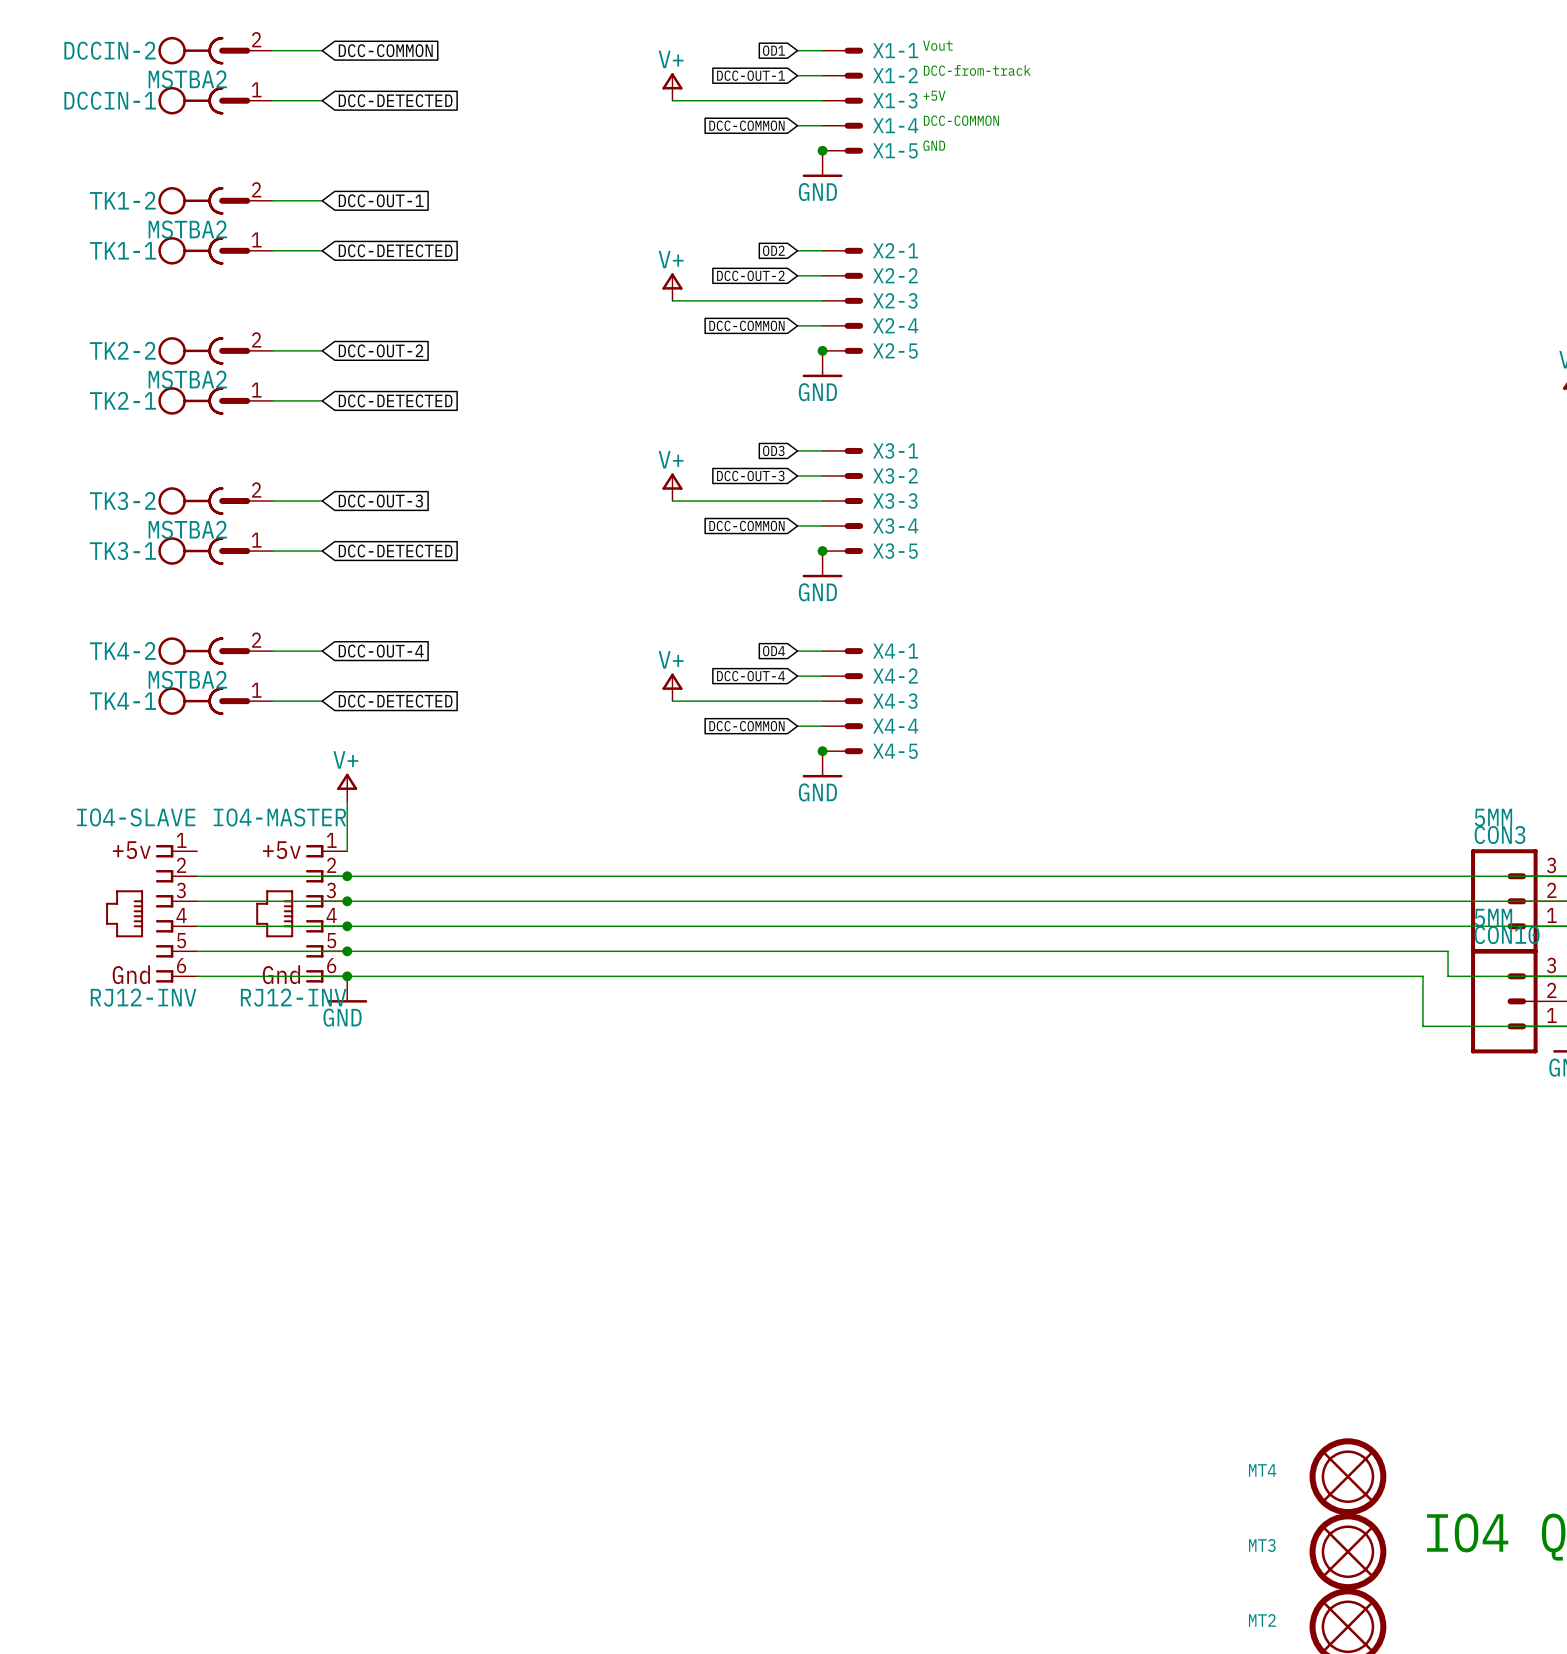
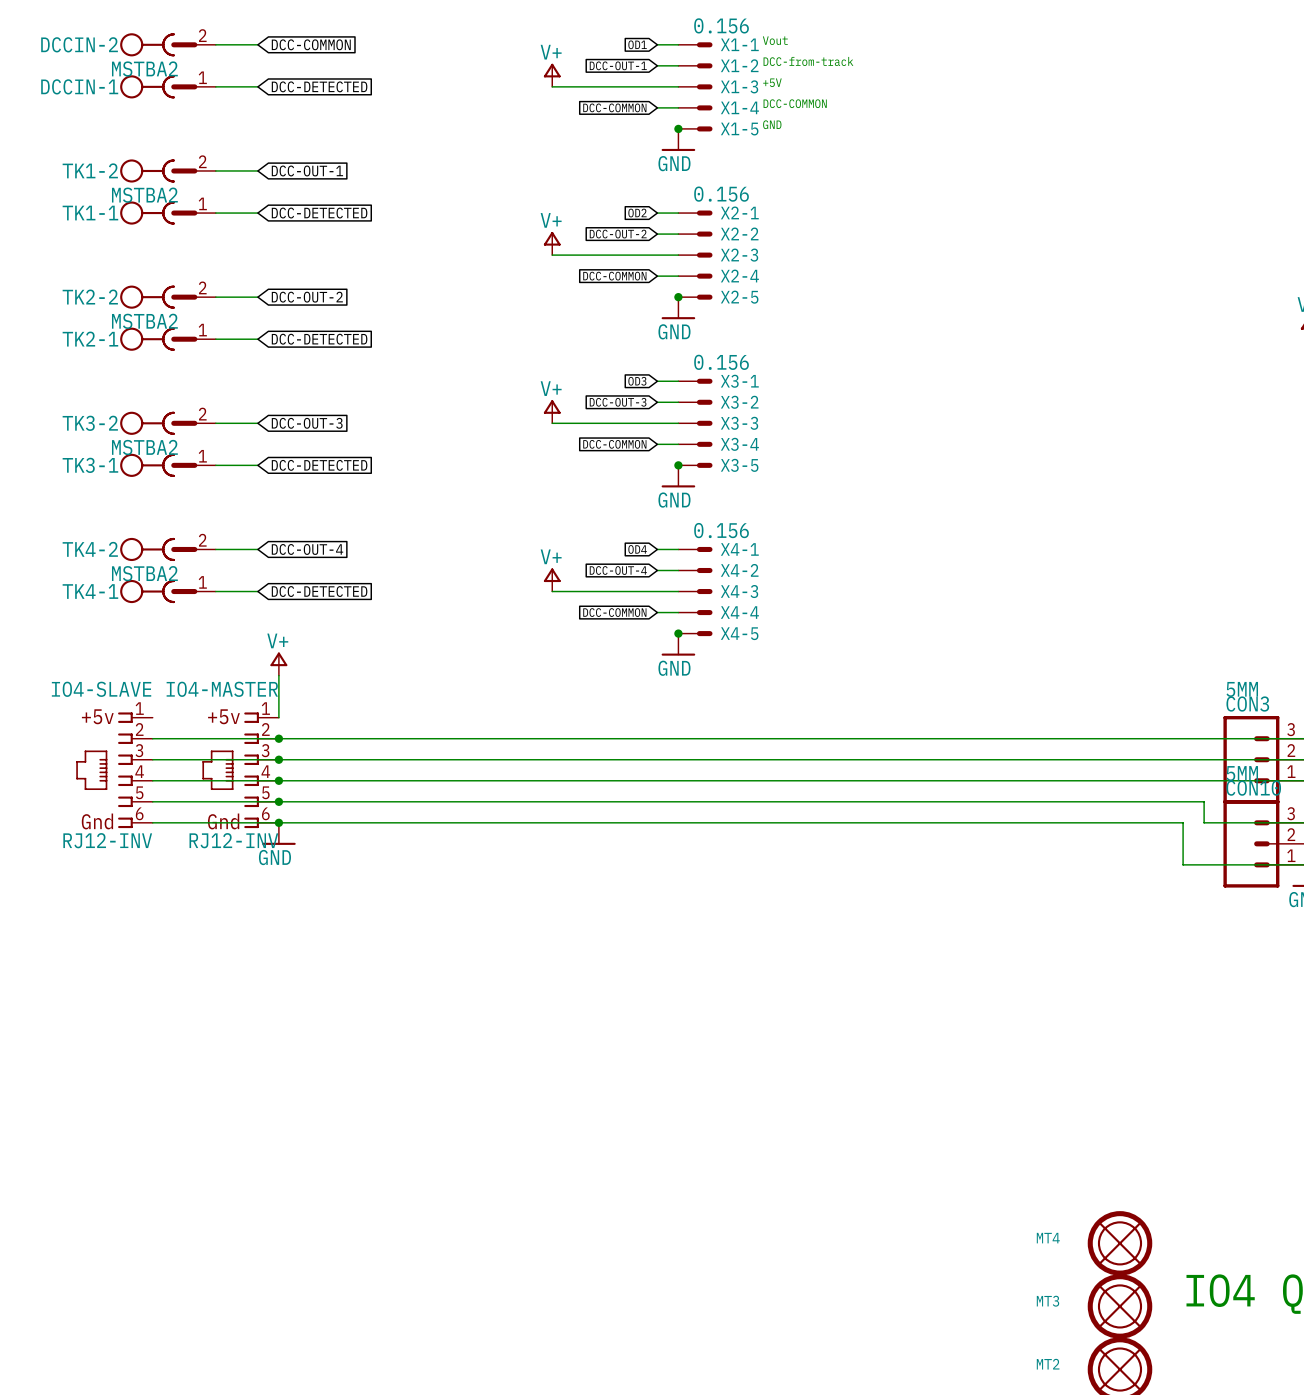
X1-1 value: none -> 0.156 (721, 25)
X2-1 value: none -> 0.156 (721, 194)
X3-1 value: none -> 0.156 (721, 362)
X4-1 value: none -> 0.156 (721, 530)

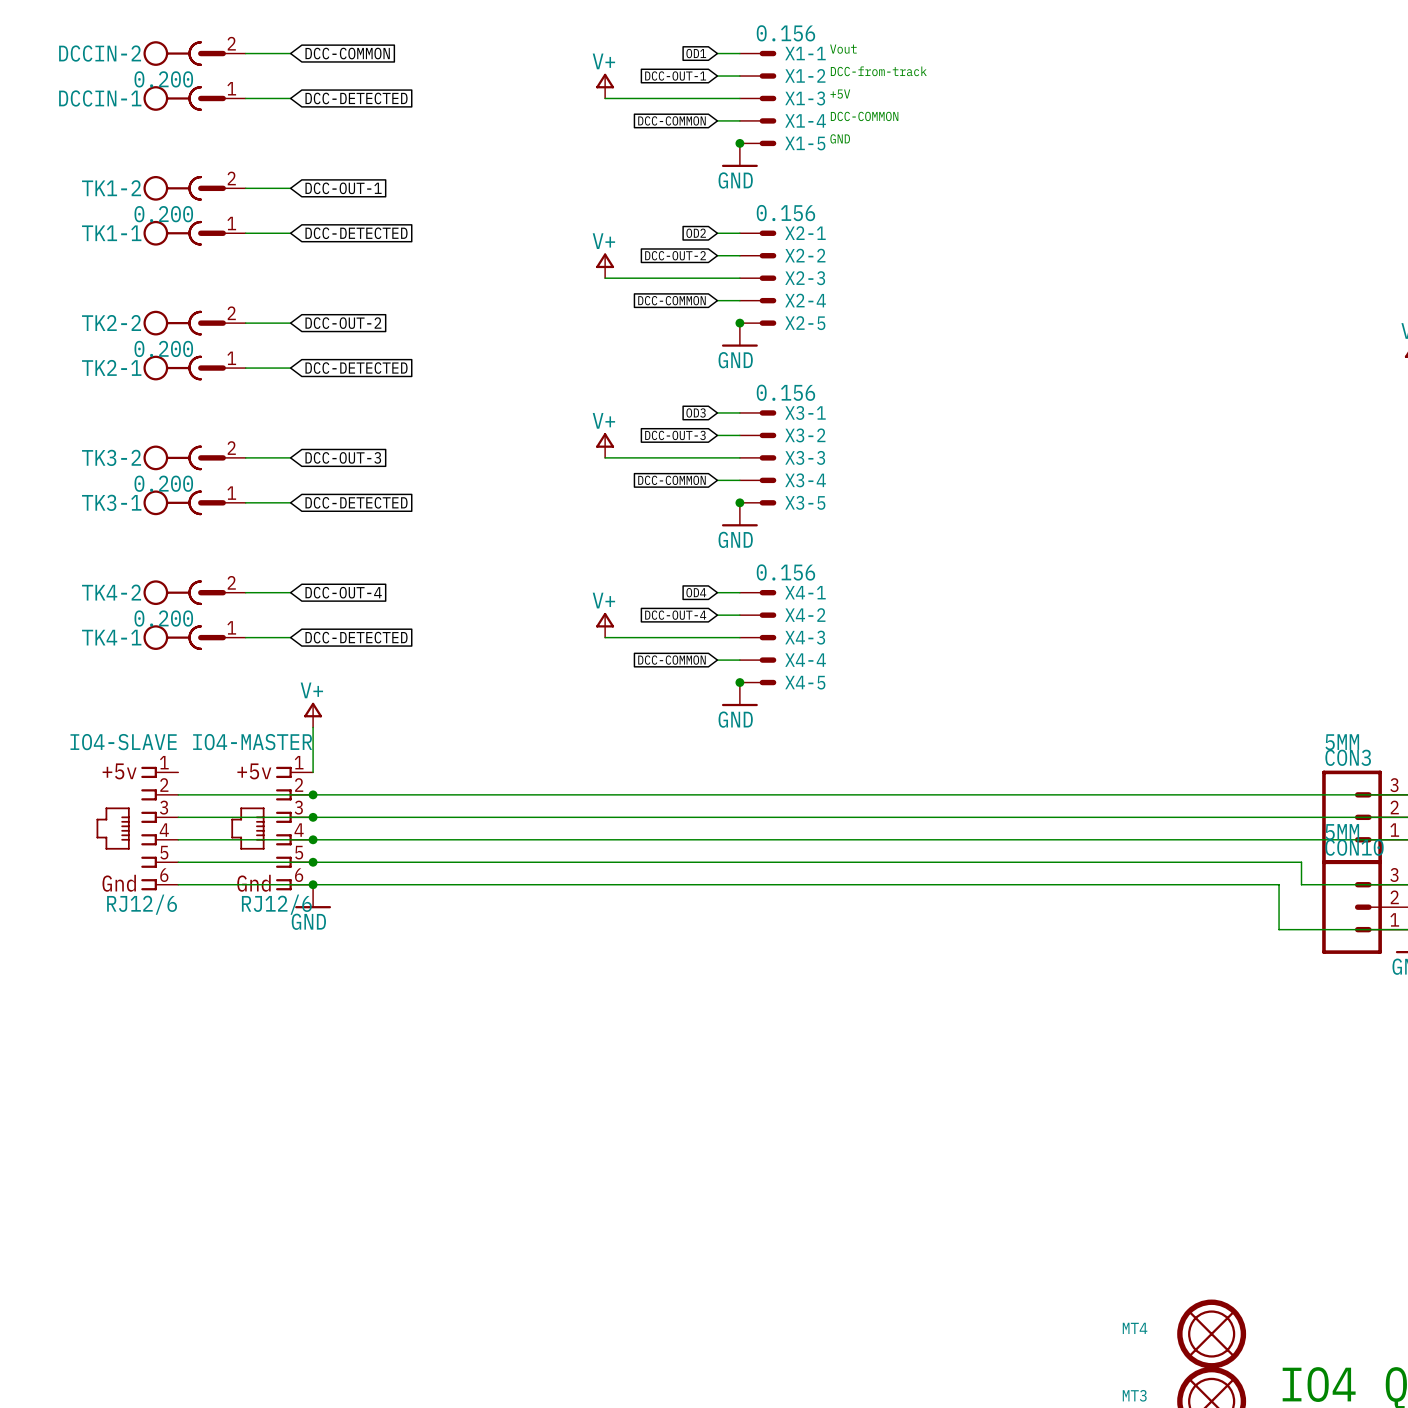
DCCIN-2 value: MSTBA2 (144, 69) -> 0.200 (163, 79)
TK1-2 value: MSTBA2 (144, 195) -> 0.200 (163, 214)
TK2-2 value: MSTBA2 (144, 321) -> 0.200 (163, 348)
TK3-2 value: MSTBA2 (144, 447) -> 0.200 (163, 483)
TK4-2 value: MSTBA2 (144, 573) -> 0.200 (163, 618)
IO4-SLAVE value: RJ12-INV (107, 840) -> RJ12/6 (142, 904)
IO4-MASTER value: RJ12-INV (233, 840) -> RJ12/6 (276, 904)

